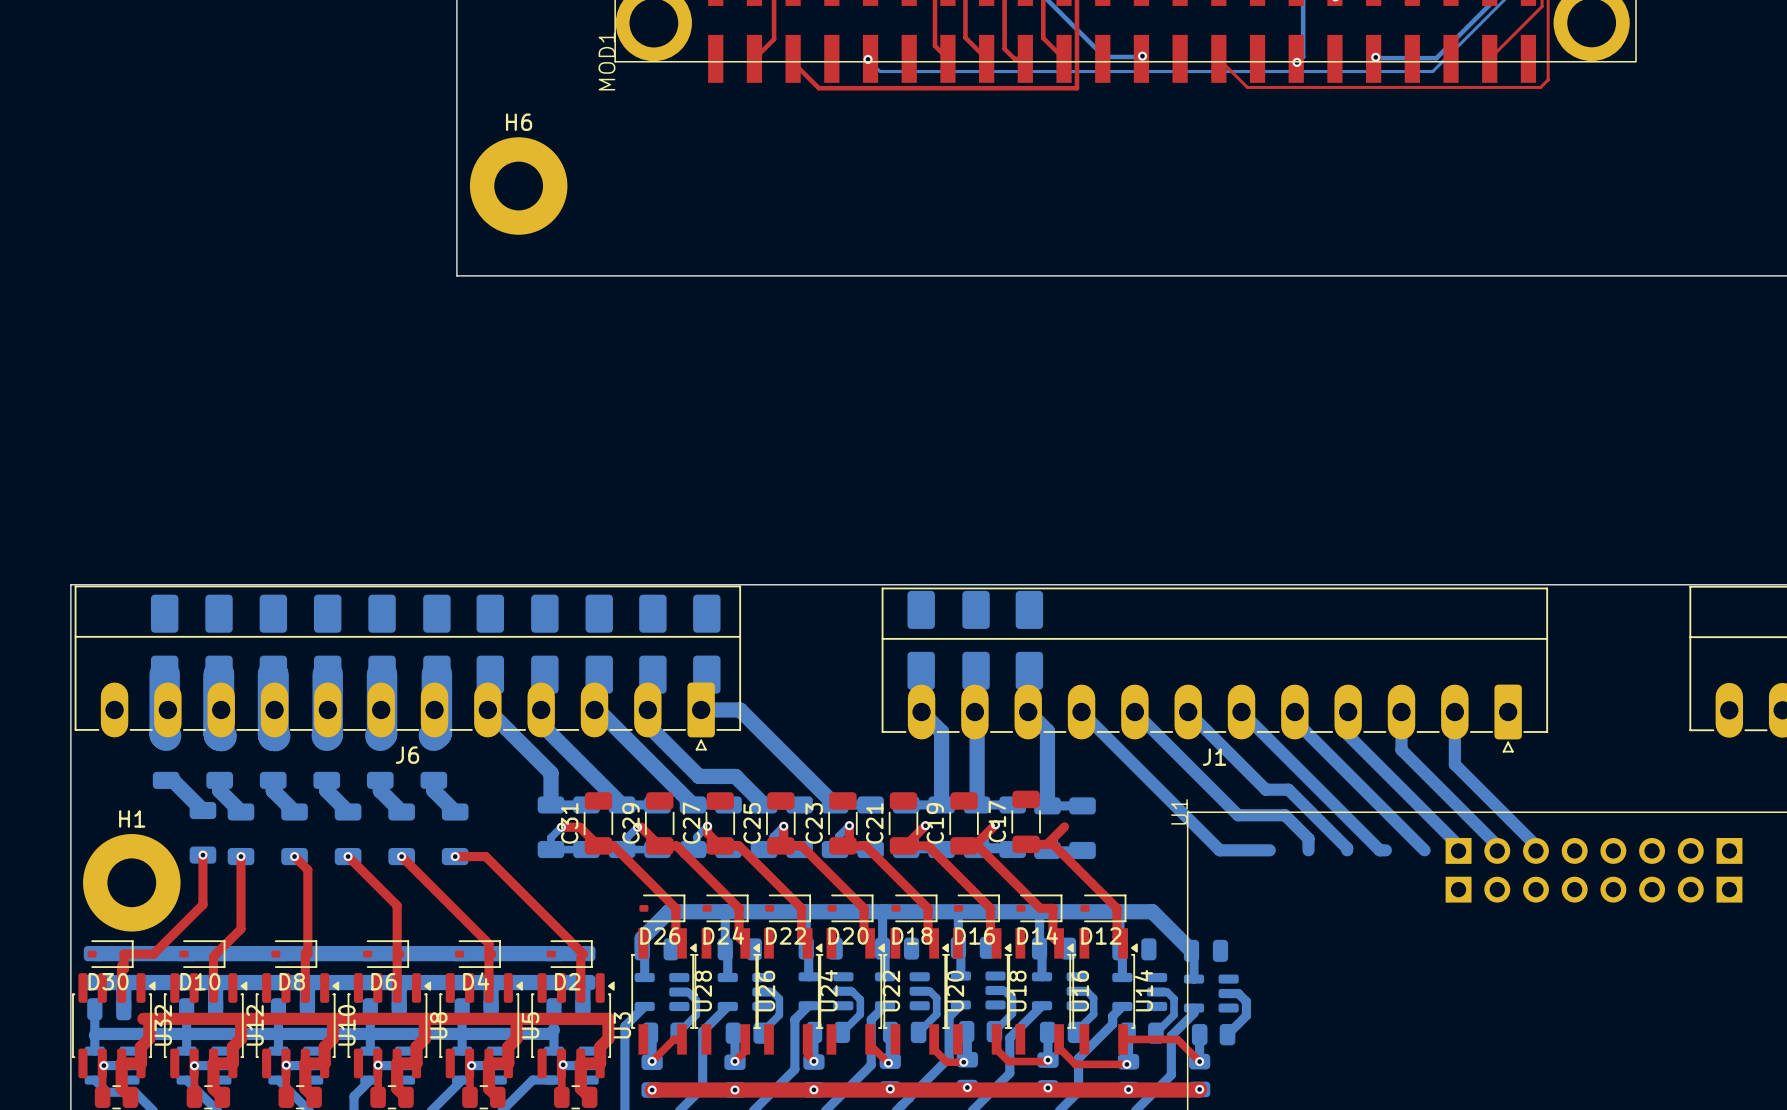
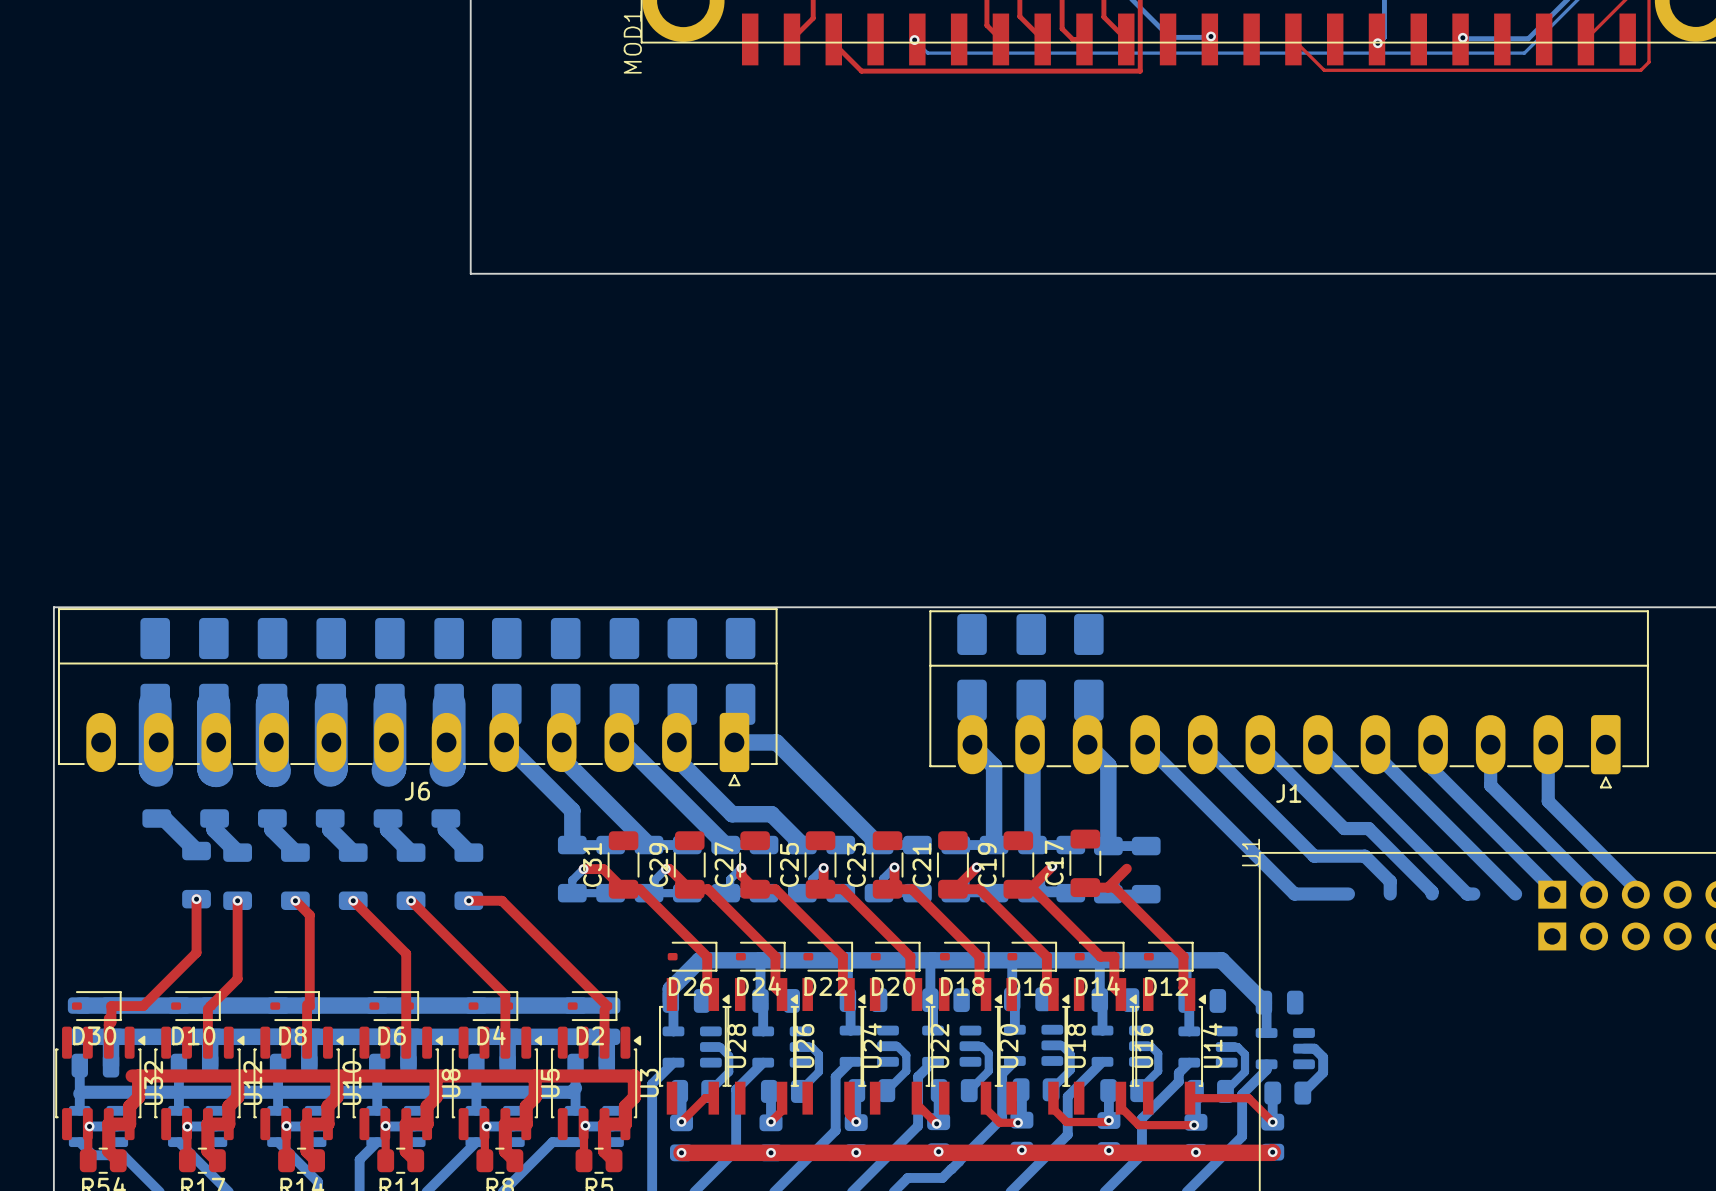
H6: (518, 186) -> none
H1: (131, 882) -> none

